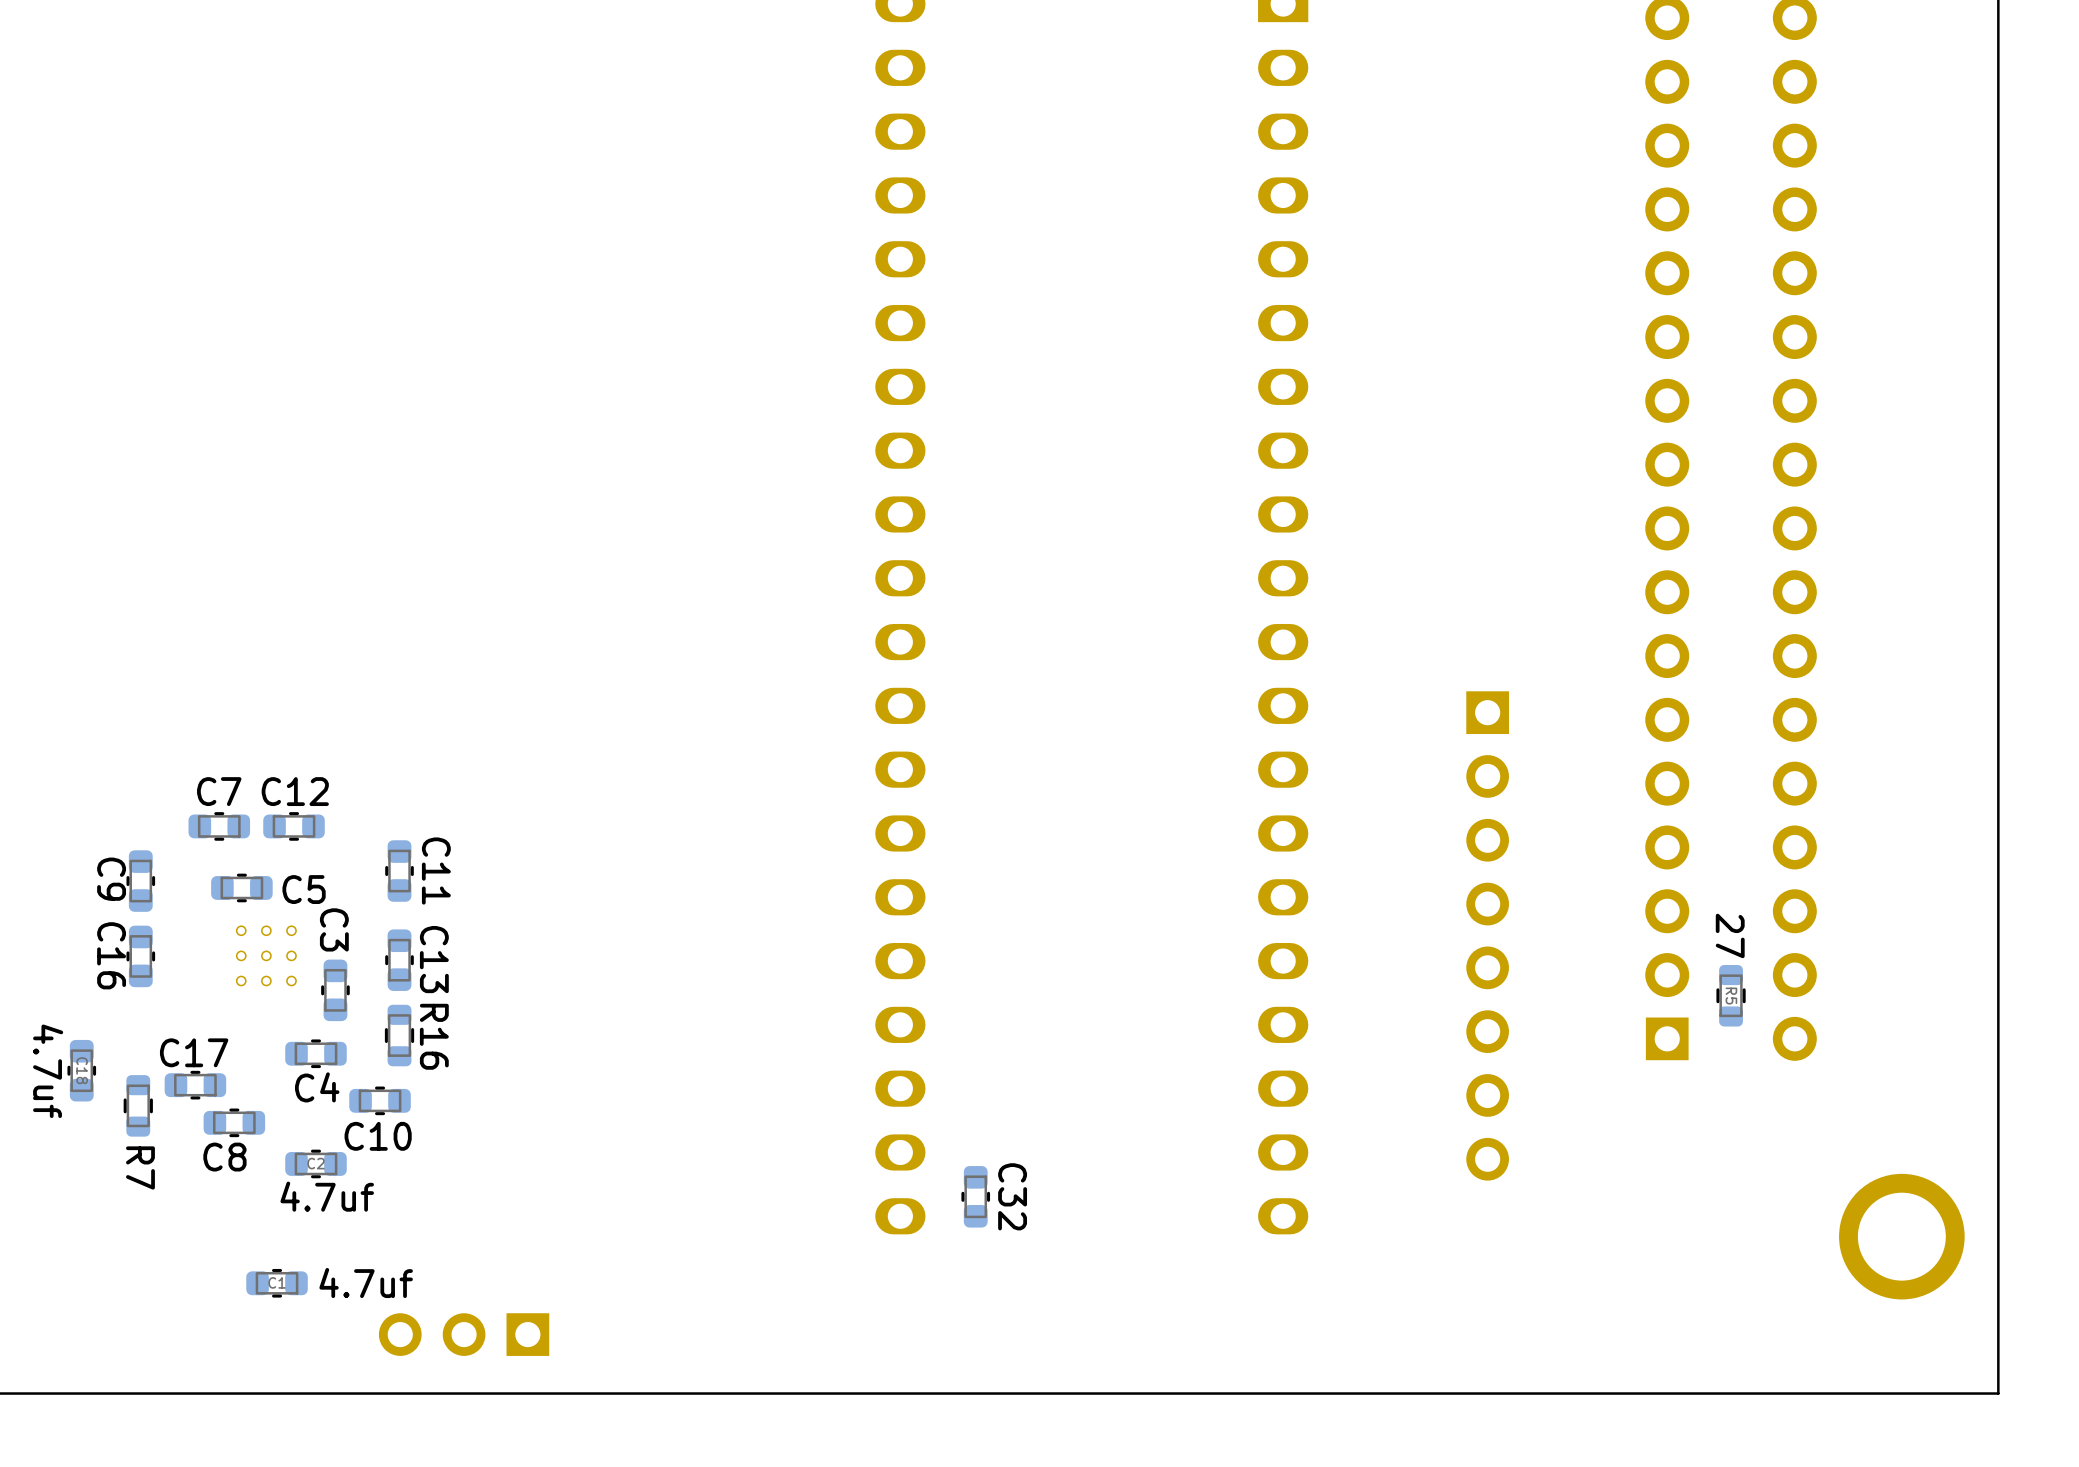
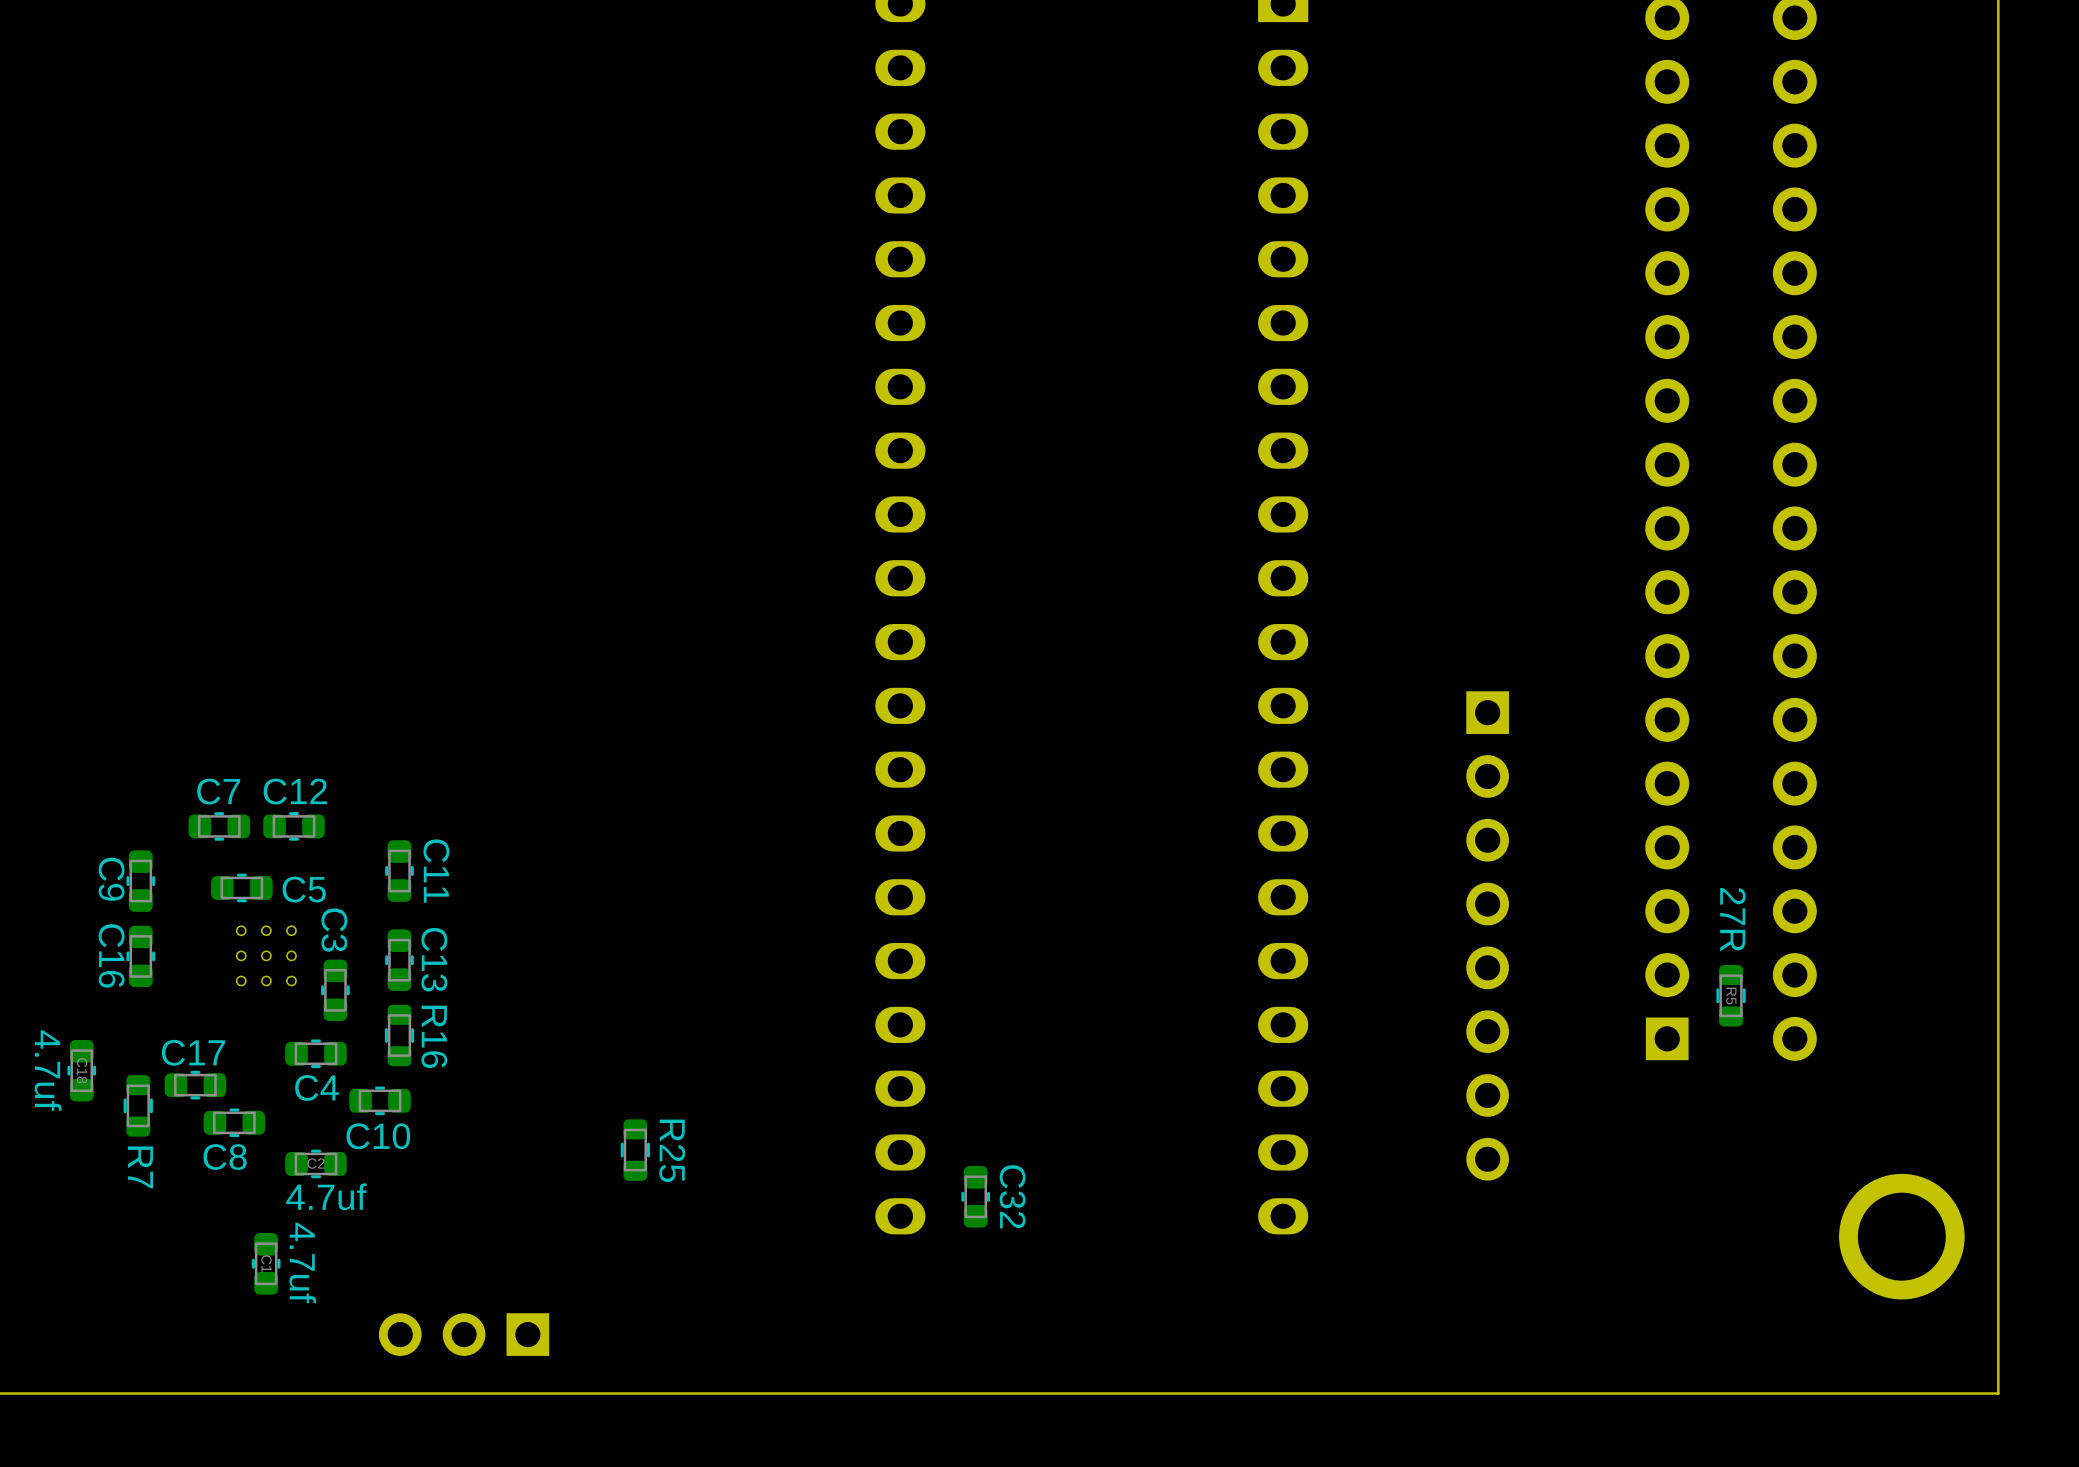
R5 value: 27 (1730, 935) -> 27R (1732, 919)
R25: none -> (635, 1150)
C1 value position: 4.7uf (366, 1282) -> 4.7uf (302, 1262)
C1 rotation: 0° (277, 1283) -> 90° clockwise (266, 1263)

